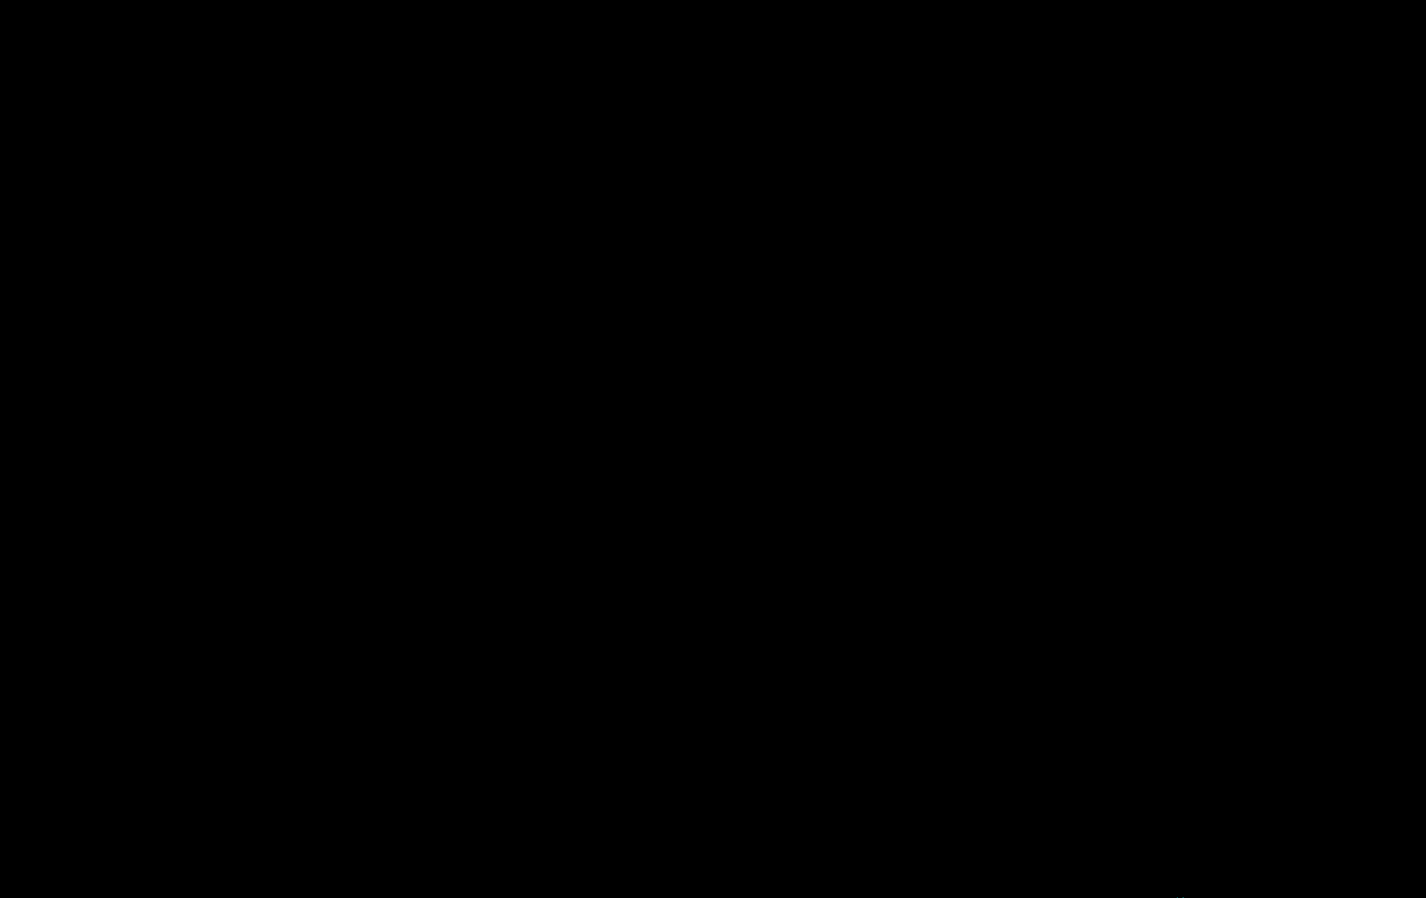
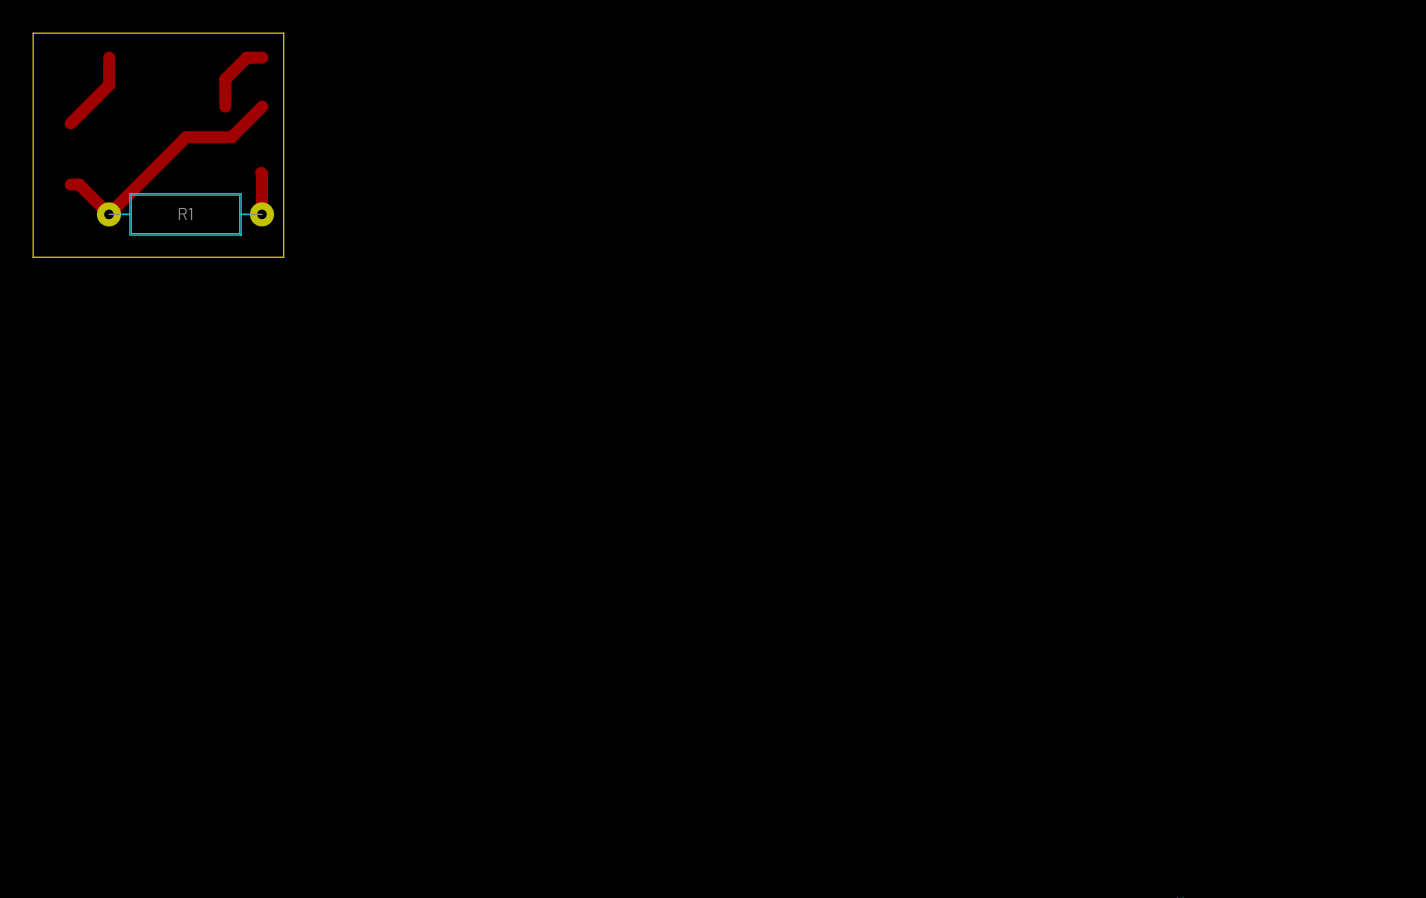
board edge: none -> (33, 33) (283, 33) (283, 257) (33, 257) (33, 33)
top track: none -> (109, 57) (109, 84) (70, 123)
top track: none -> (262, 57) (246, 57) (225, 79) (225, 106)
top track: none -> (262, 106) (231, 137) (186, 137) (108, 214)
top track: none -> (261, 172) (261, 214)
top track: none -> (70, 184) (79, 184) (108, 214)
R1: none -> (185, 214)

